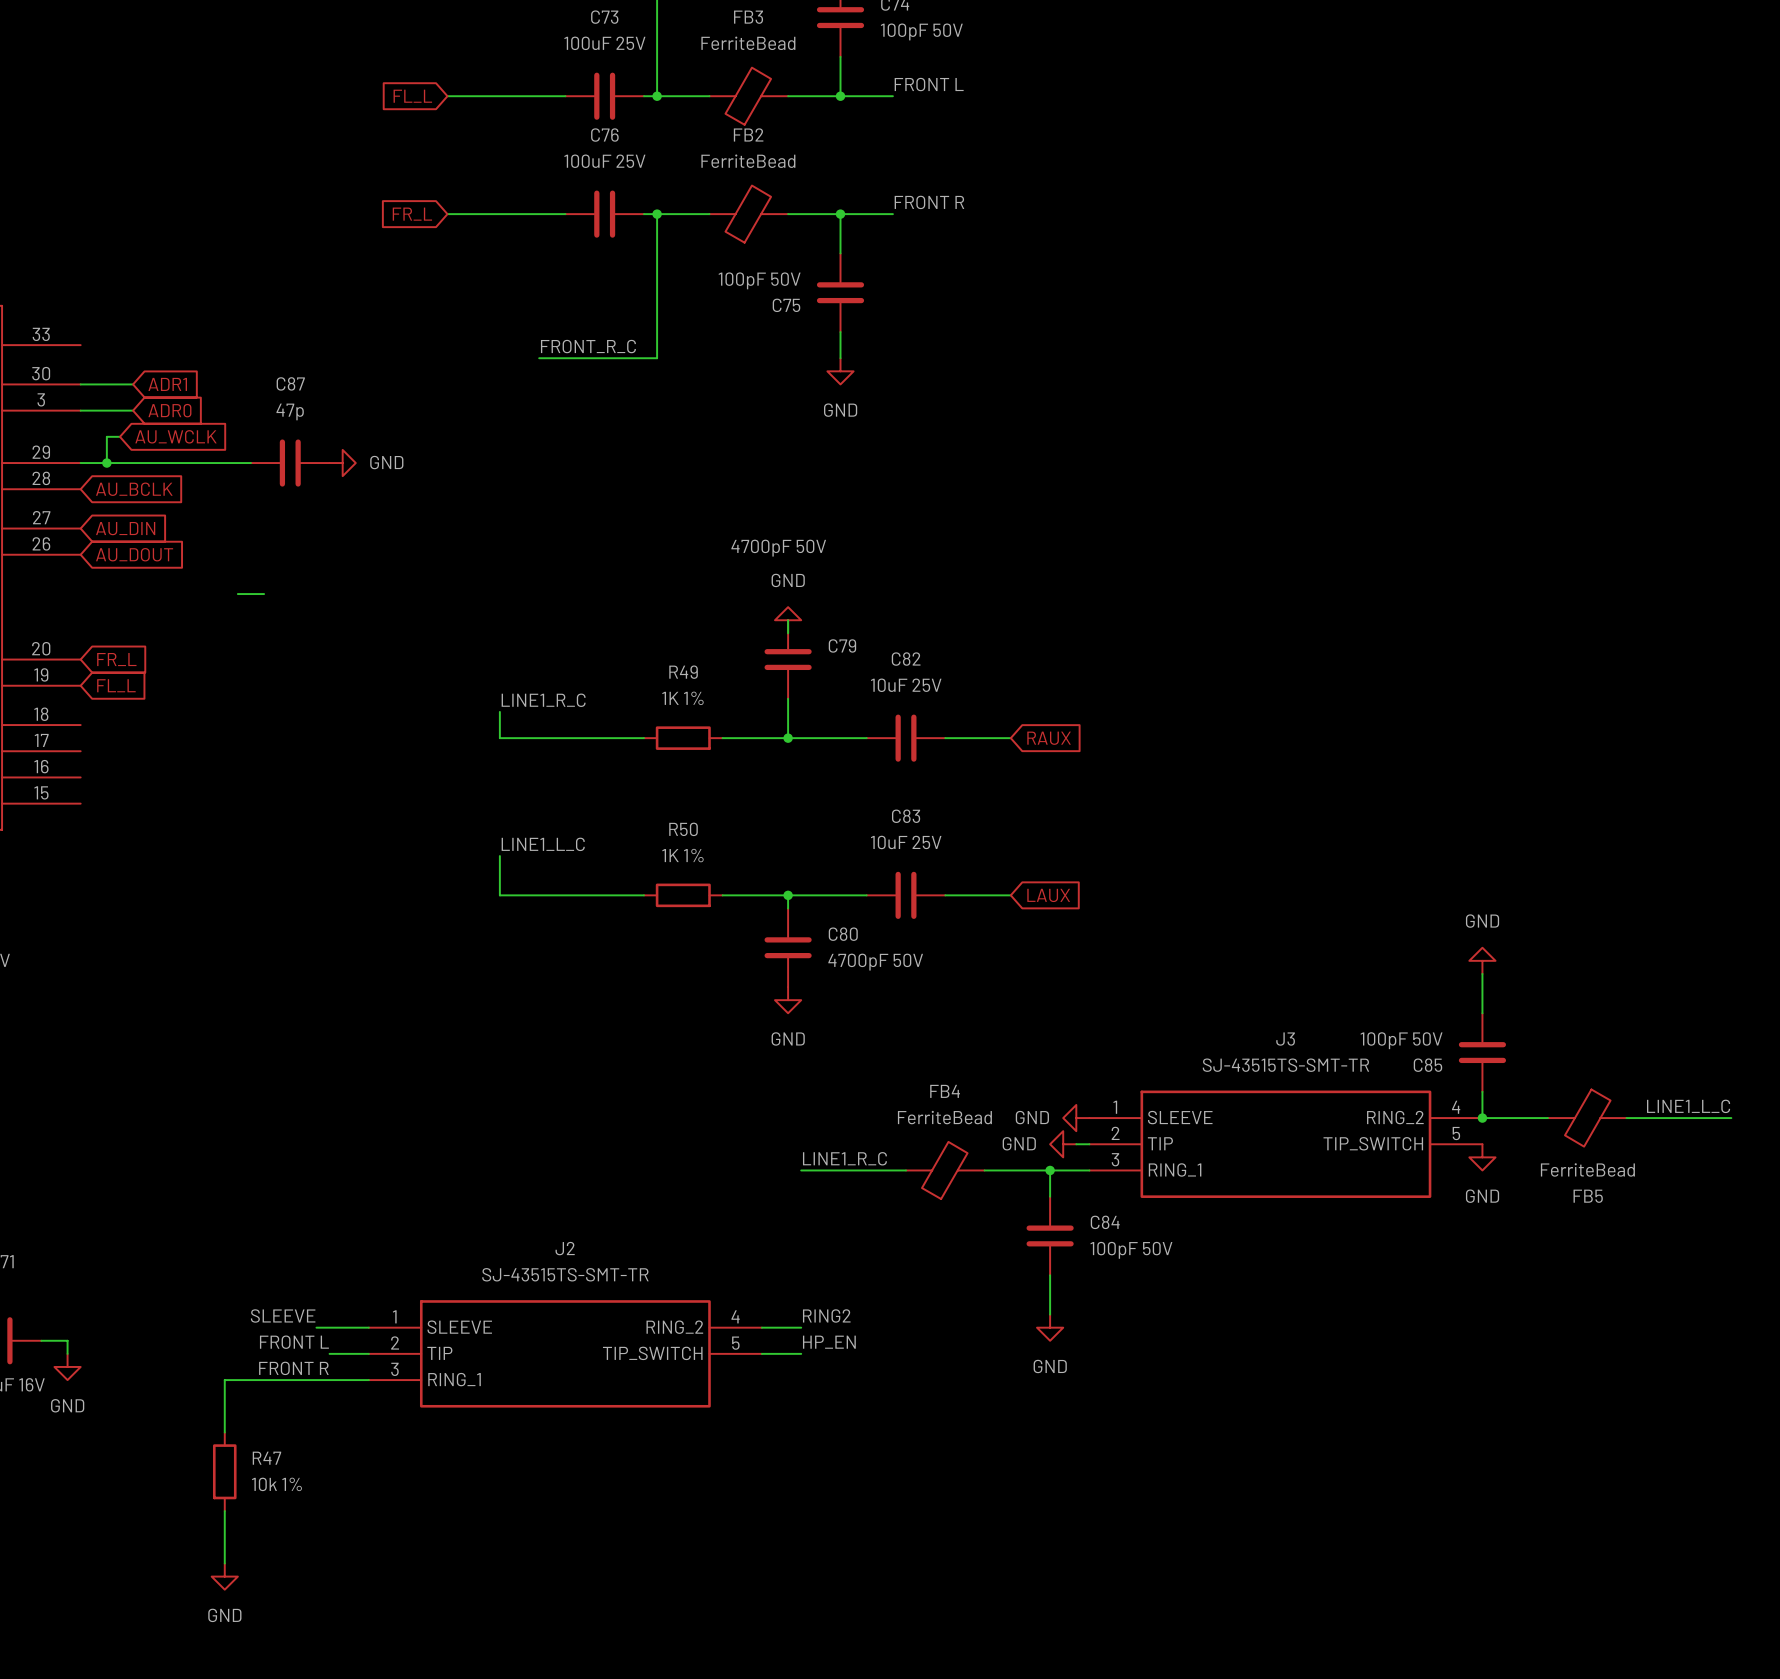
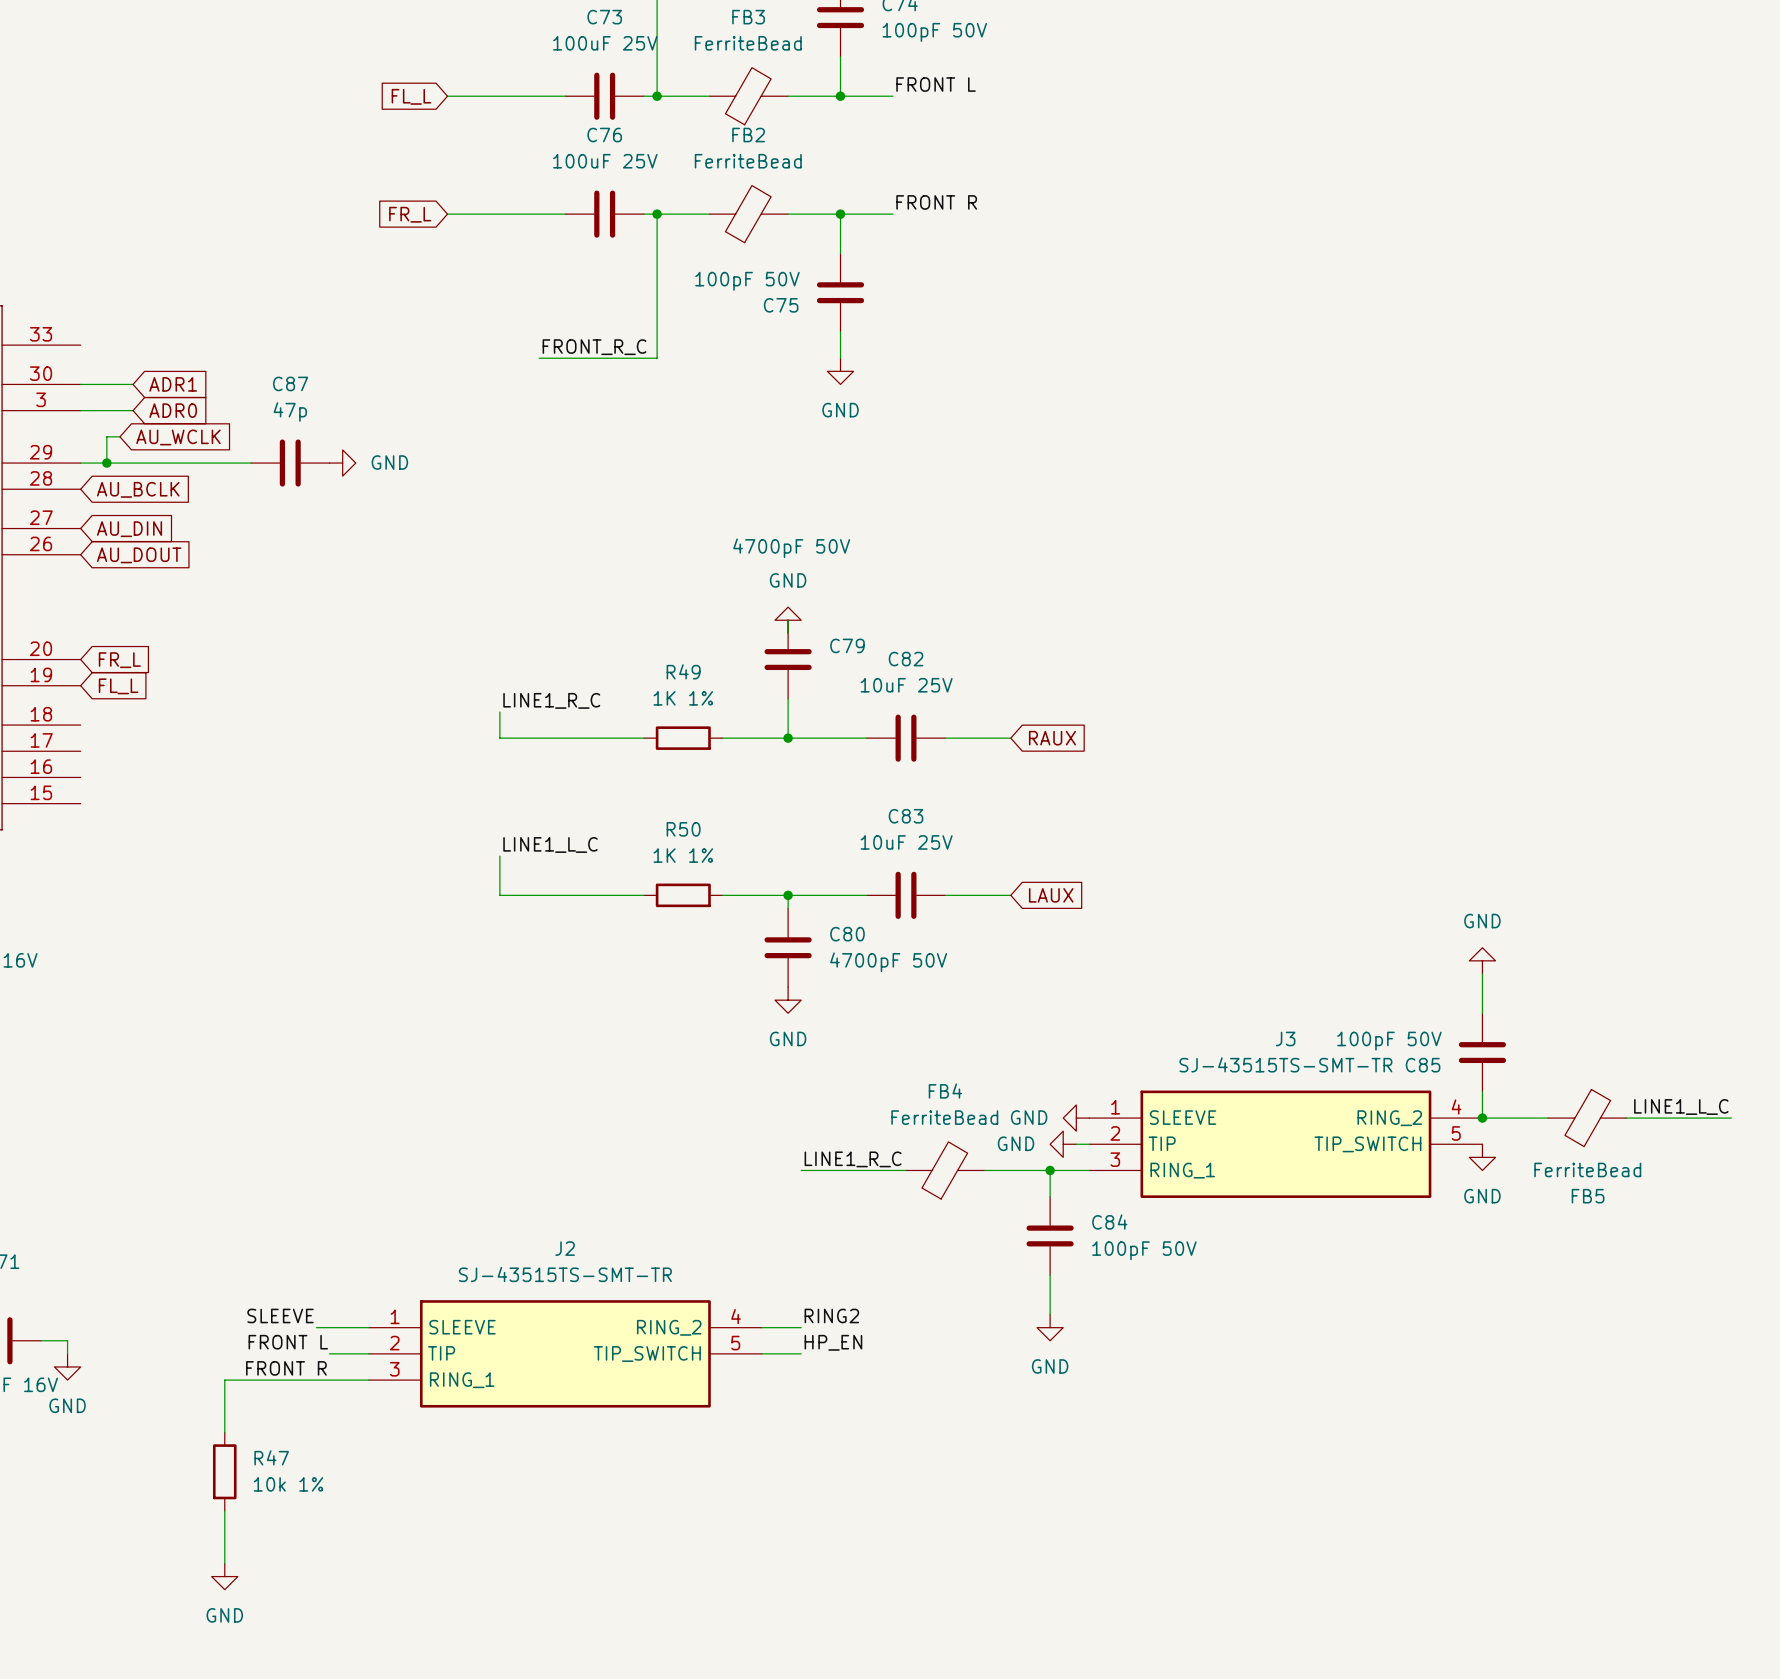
wire: (237, 594) (264, 594) -> none

